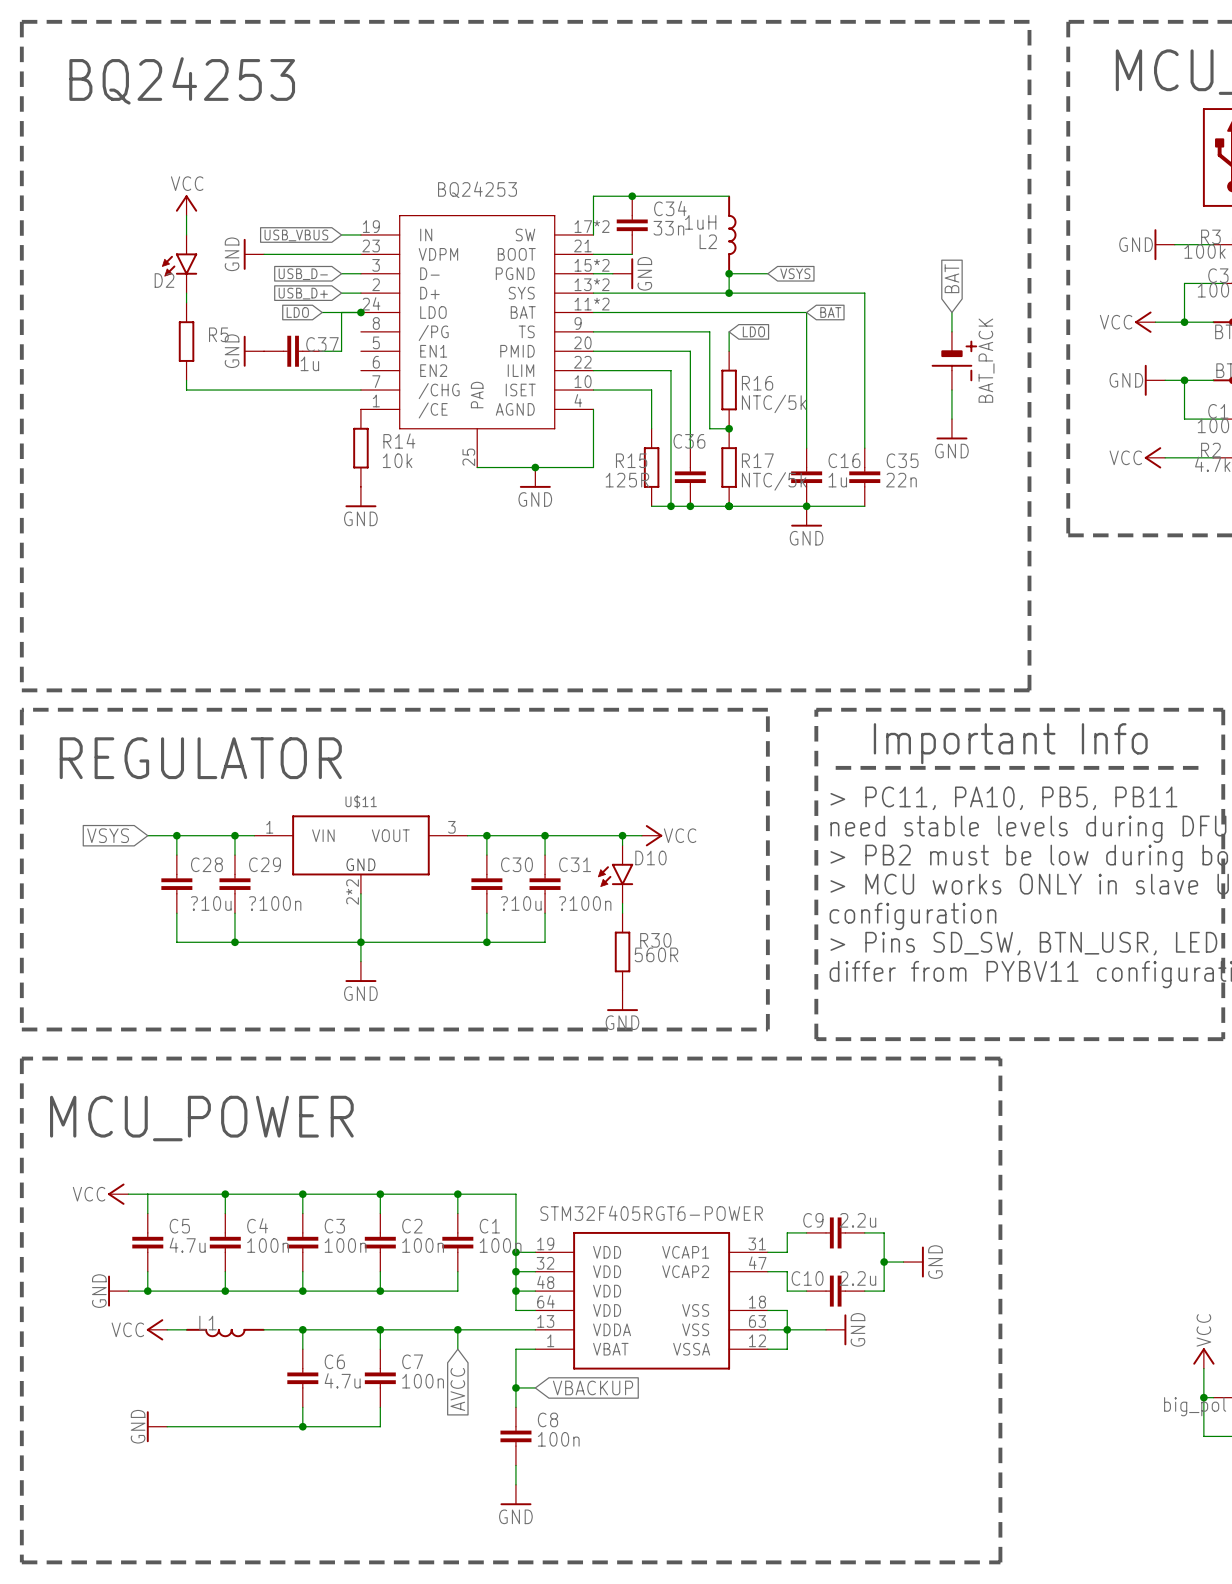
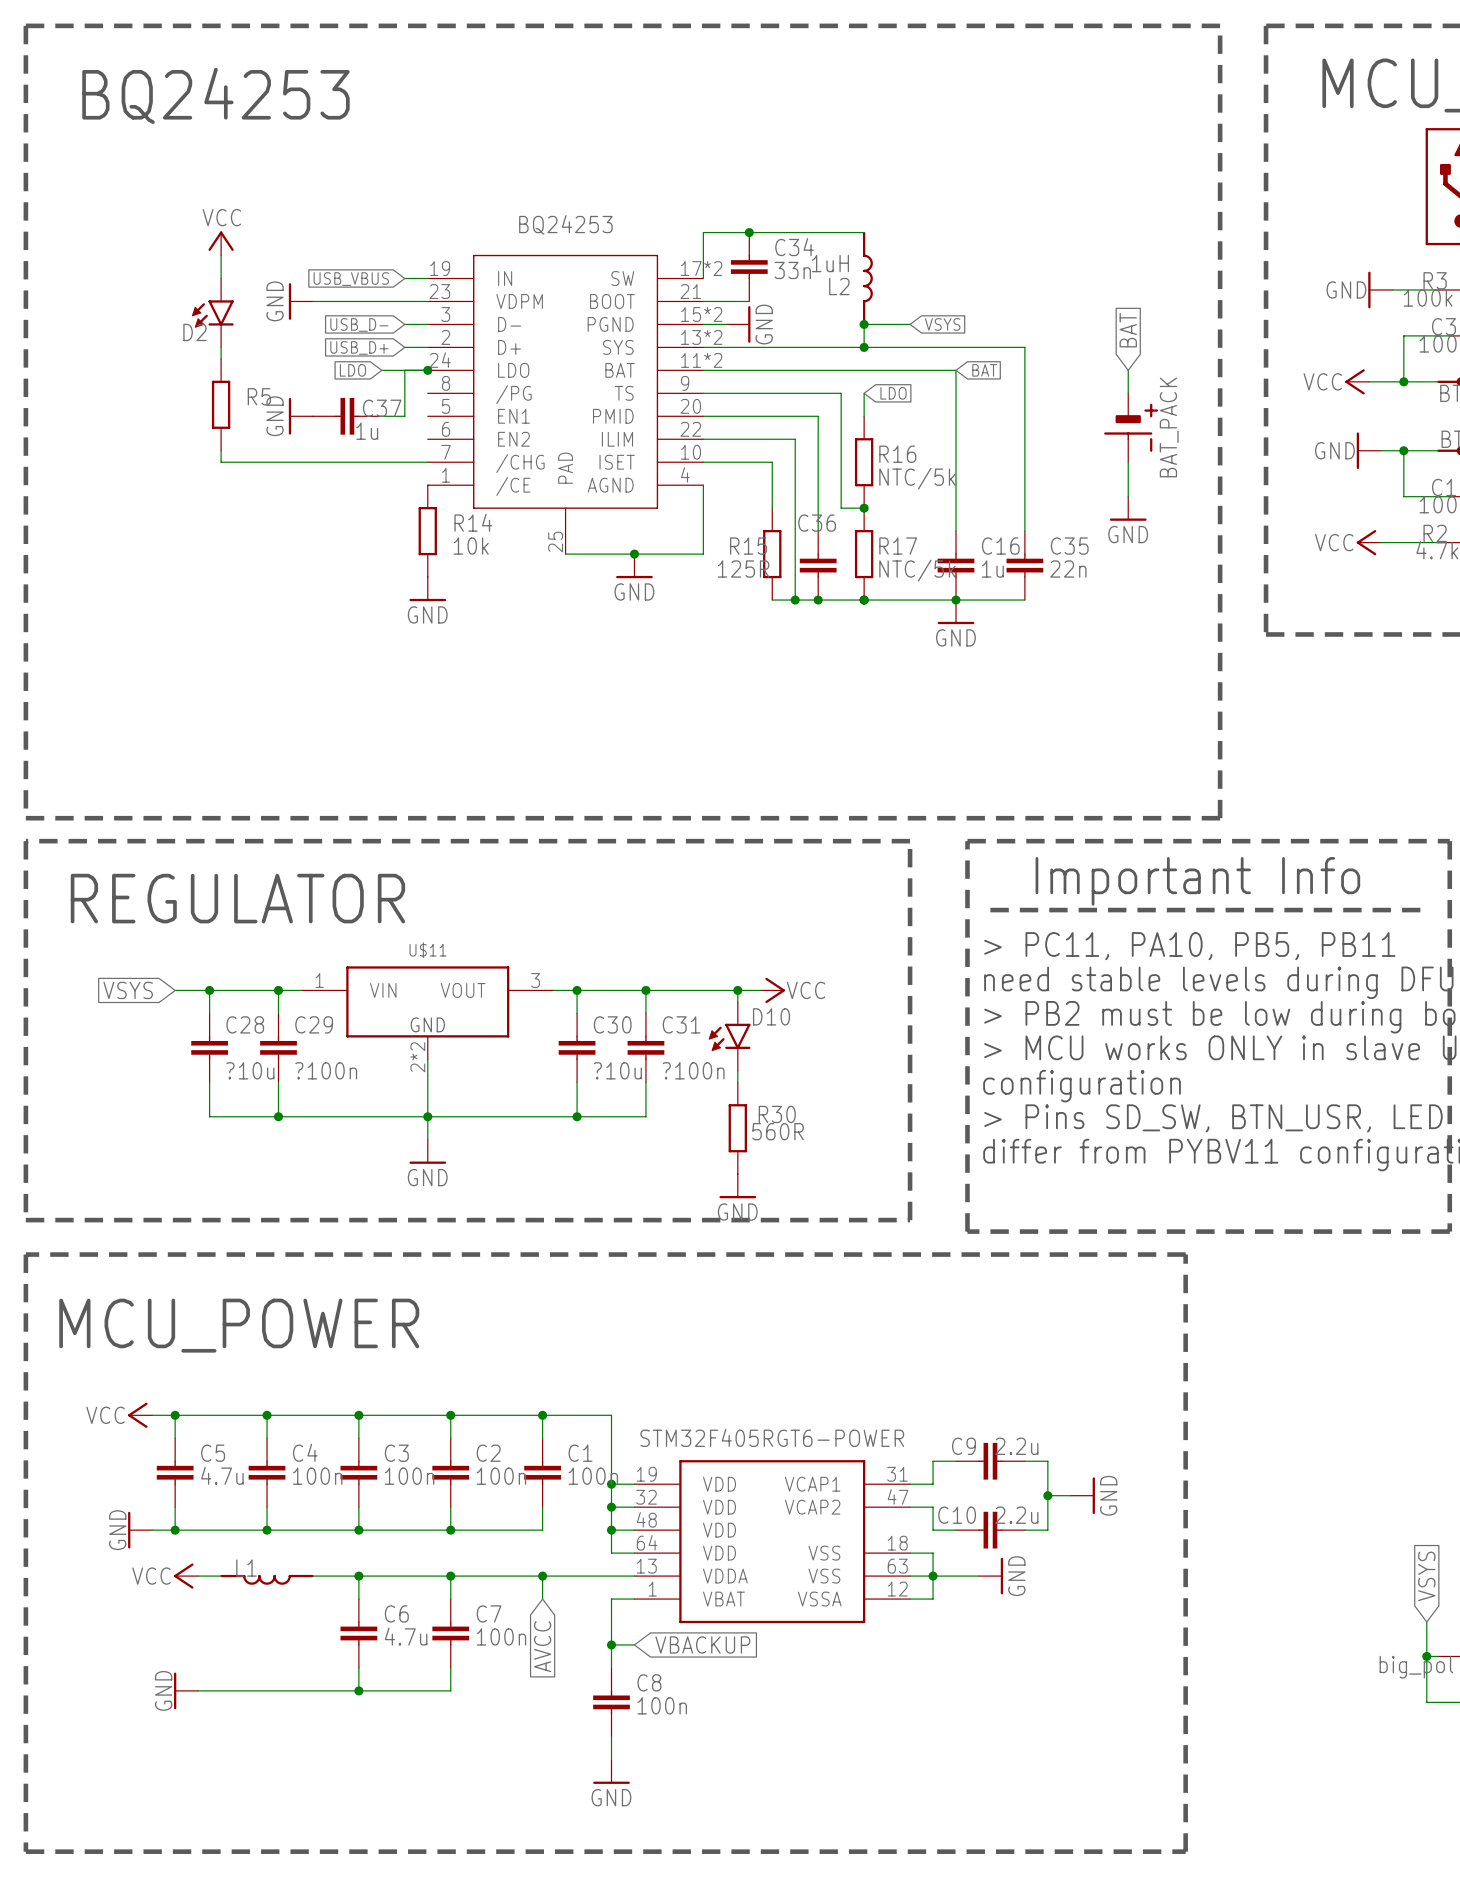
junction: none -> (175, 1415)
global label: none -> VSYS (1426, 1576)
power symbol: VCC (1203, 1358) -> none

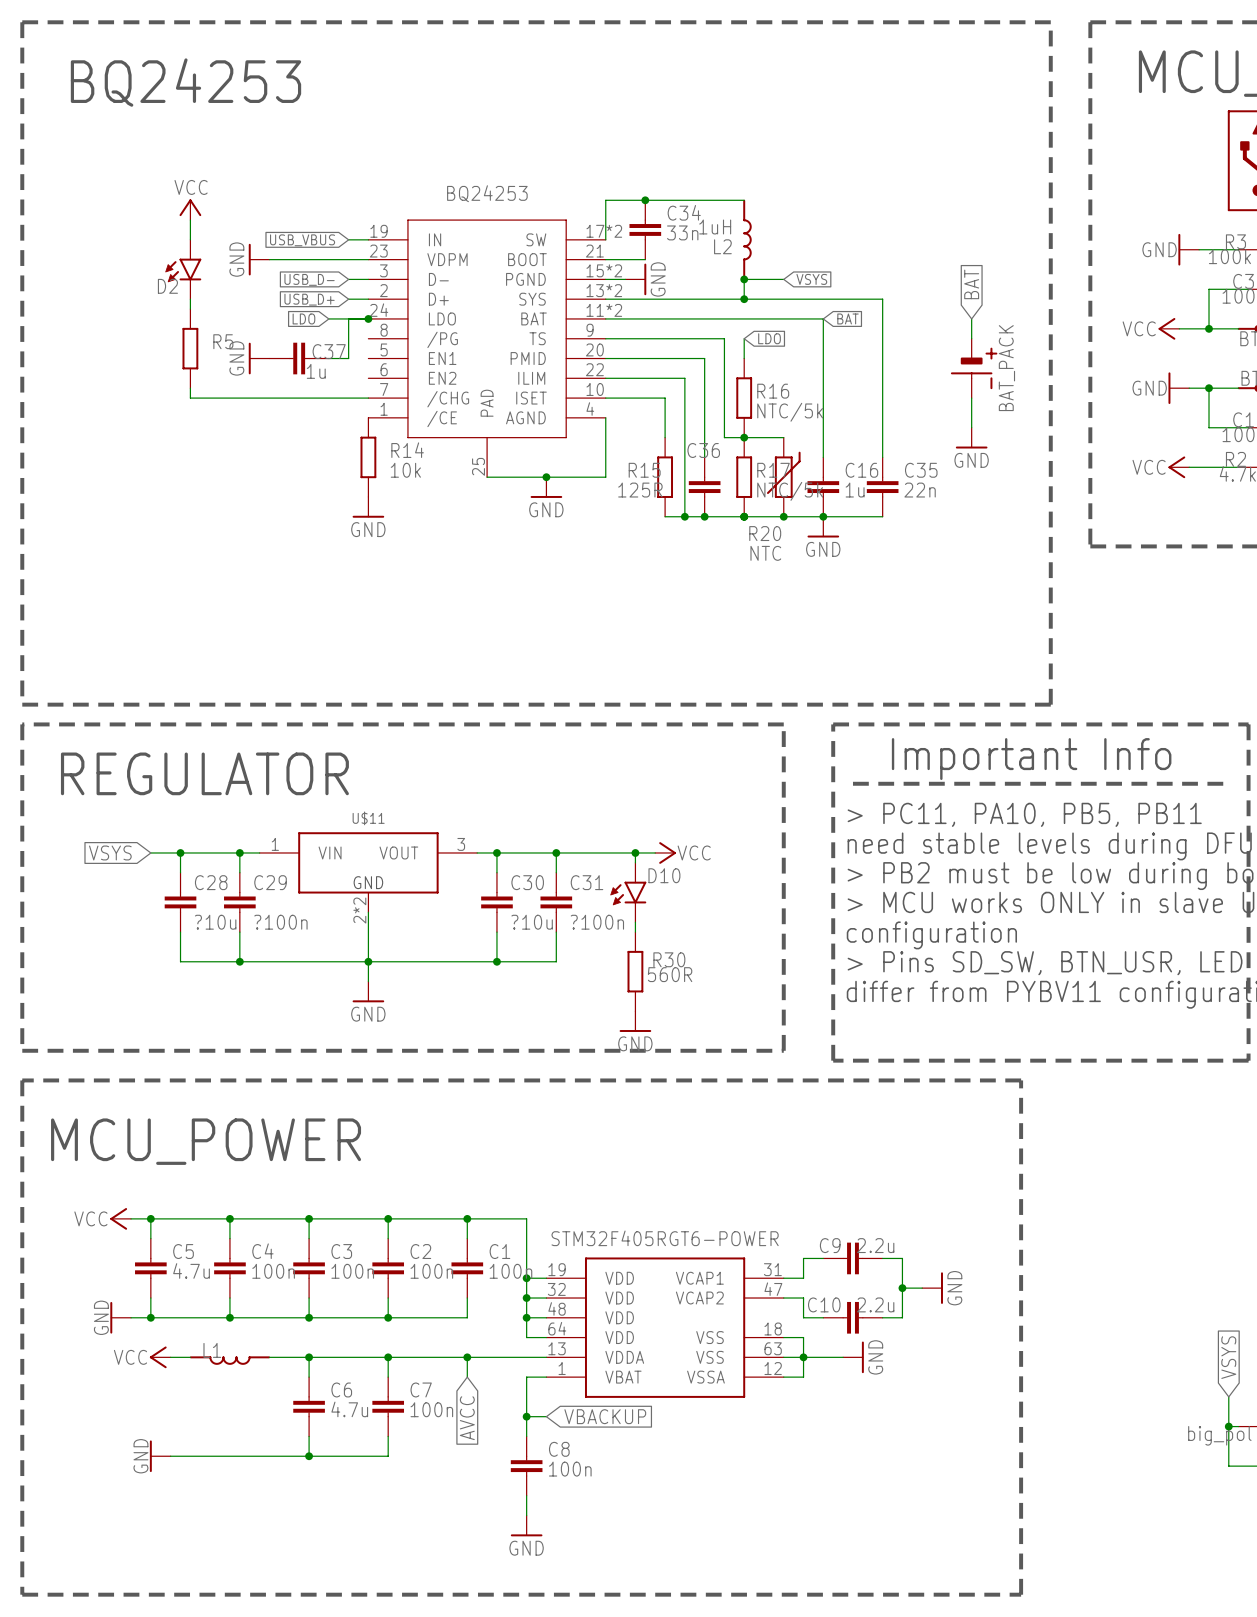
wire: none -> (744, 437) (783, 437)
R20: none -> NTC (783, 477)
junction: none -> (783, 516)

